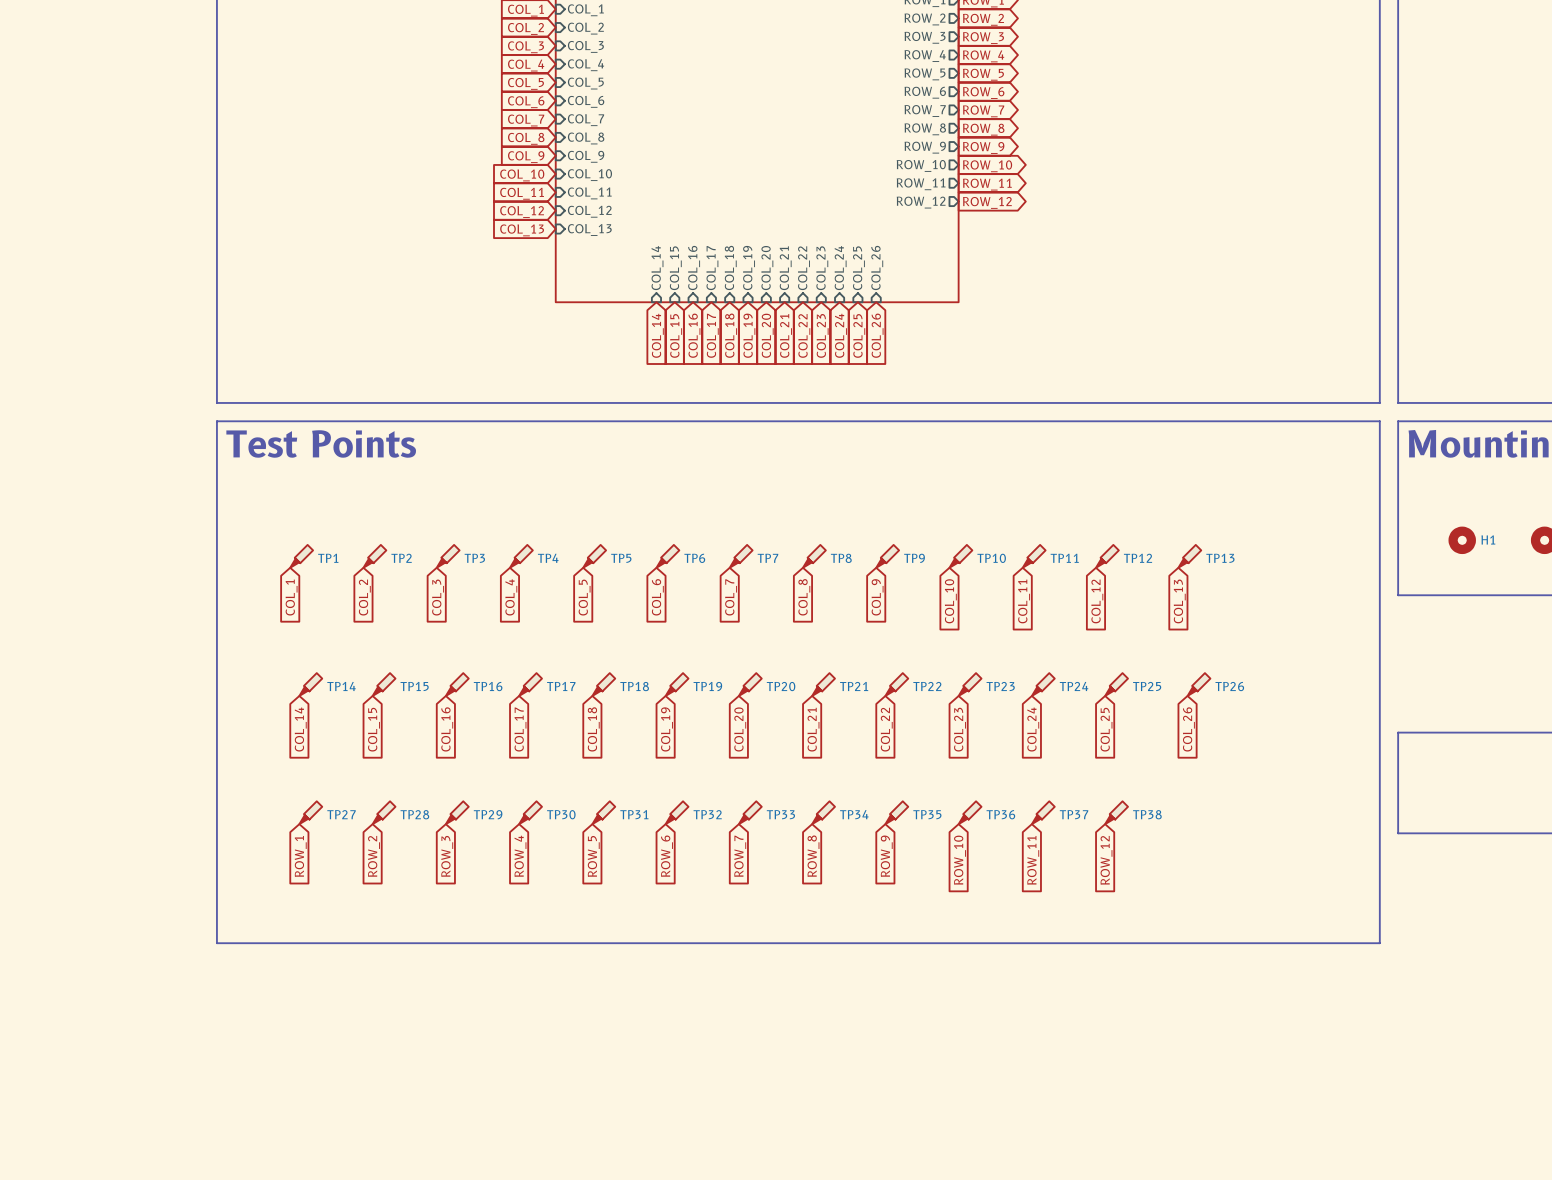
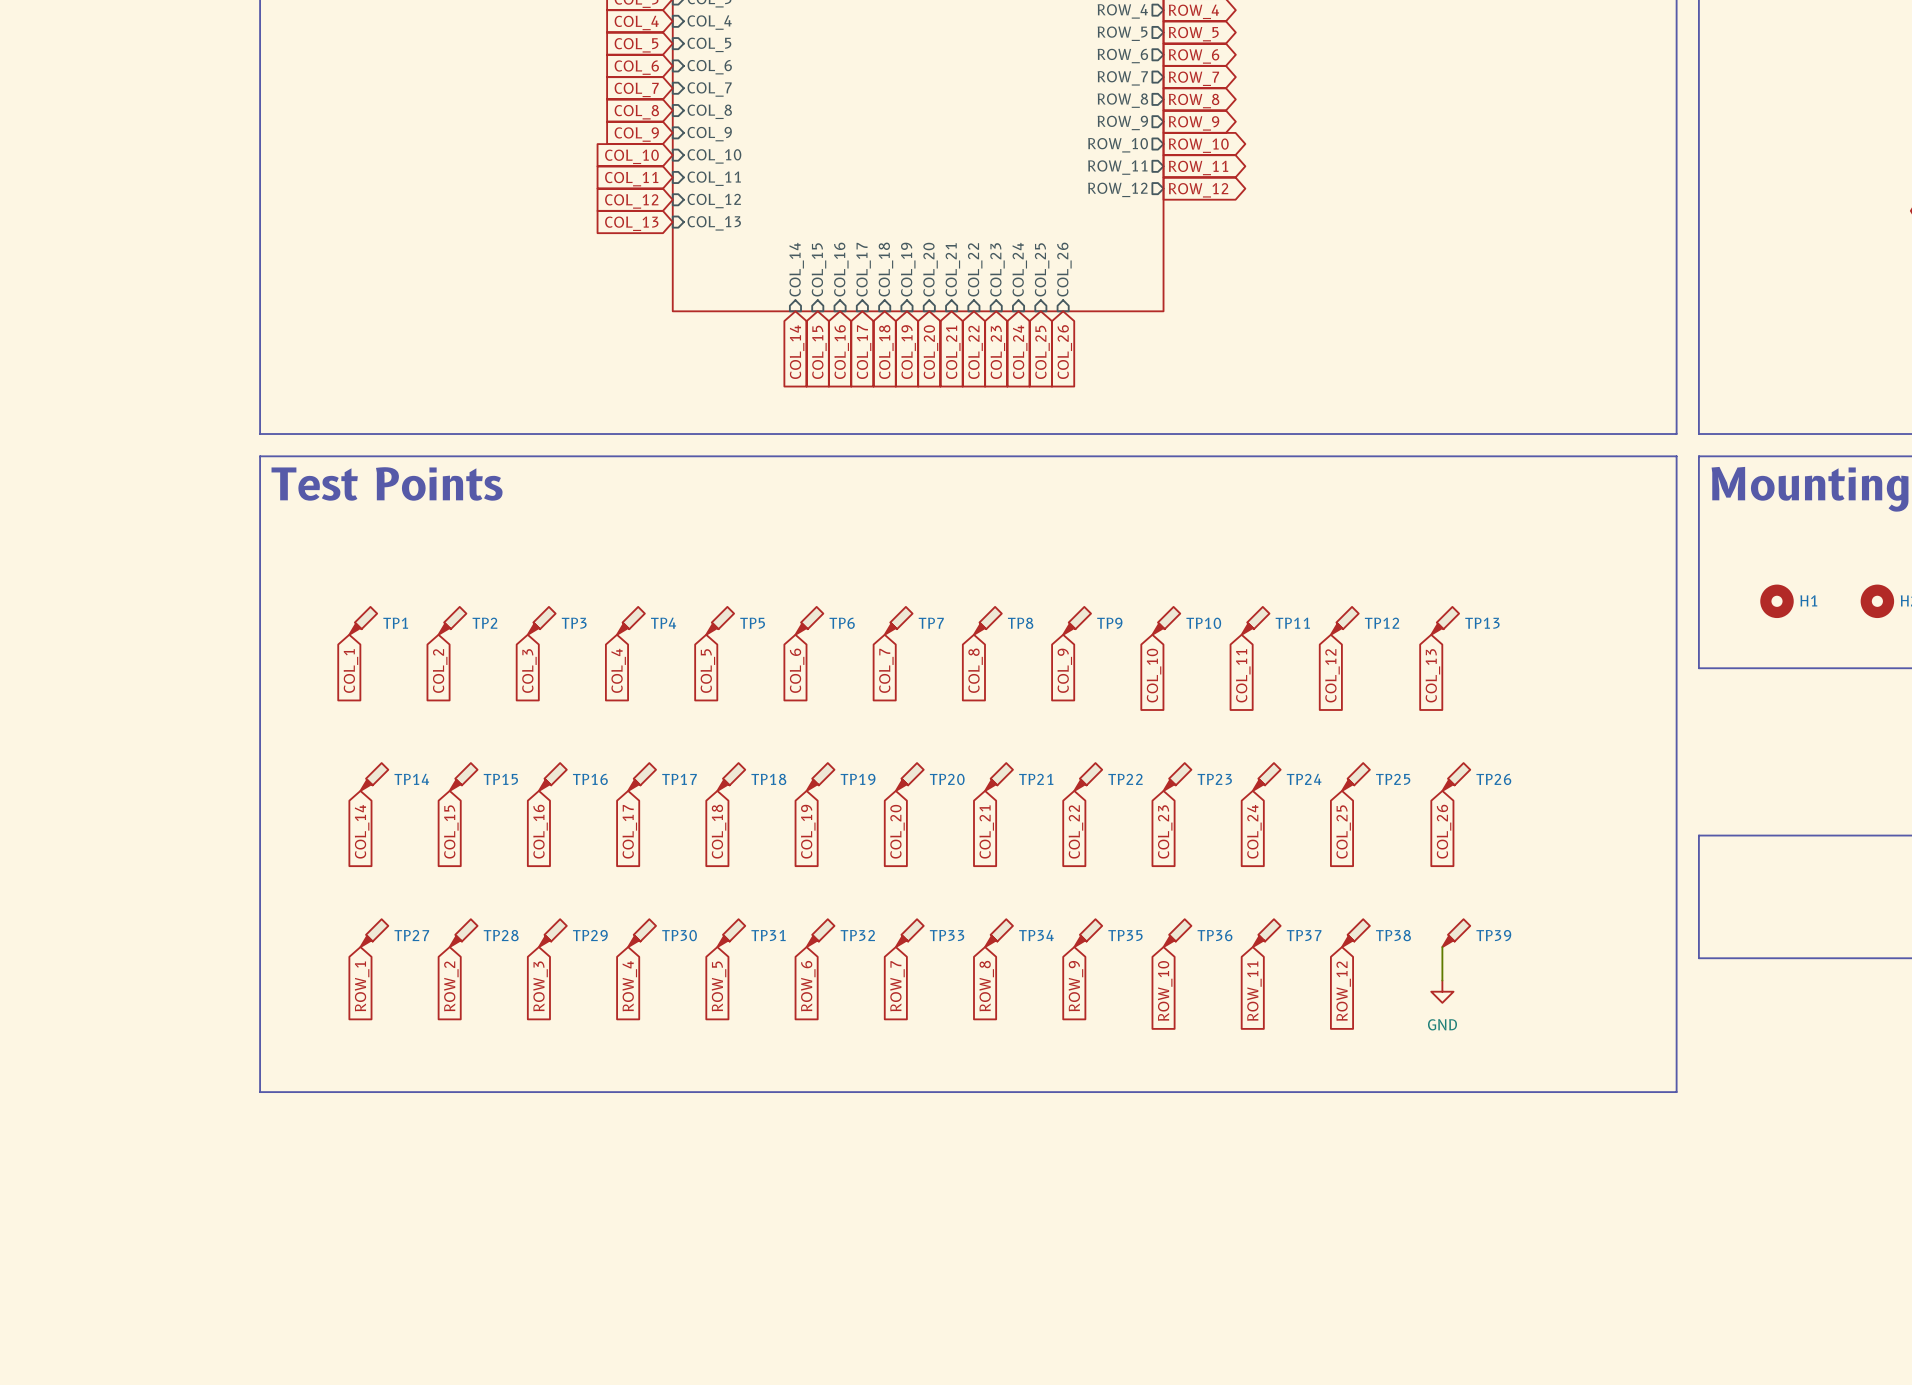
TP39: none -> (1456, 933)
wire: none -> (1442, 947) (1442, 980)
power symbol: none -> GND (1442, 991)

